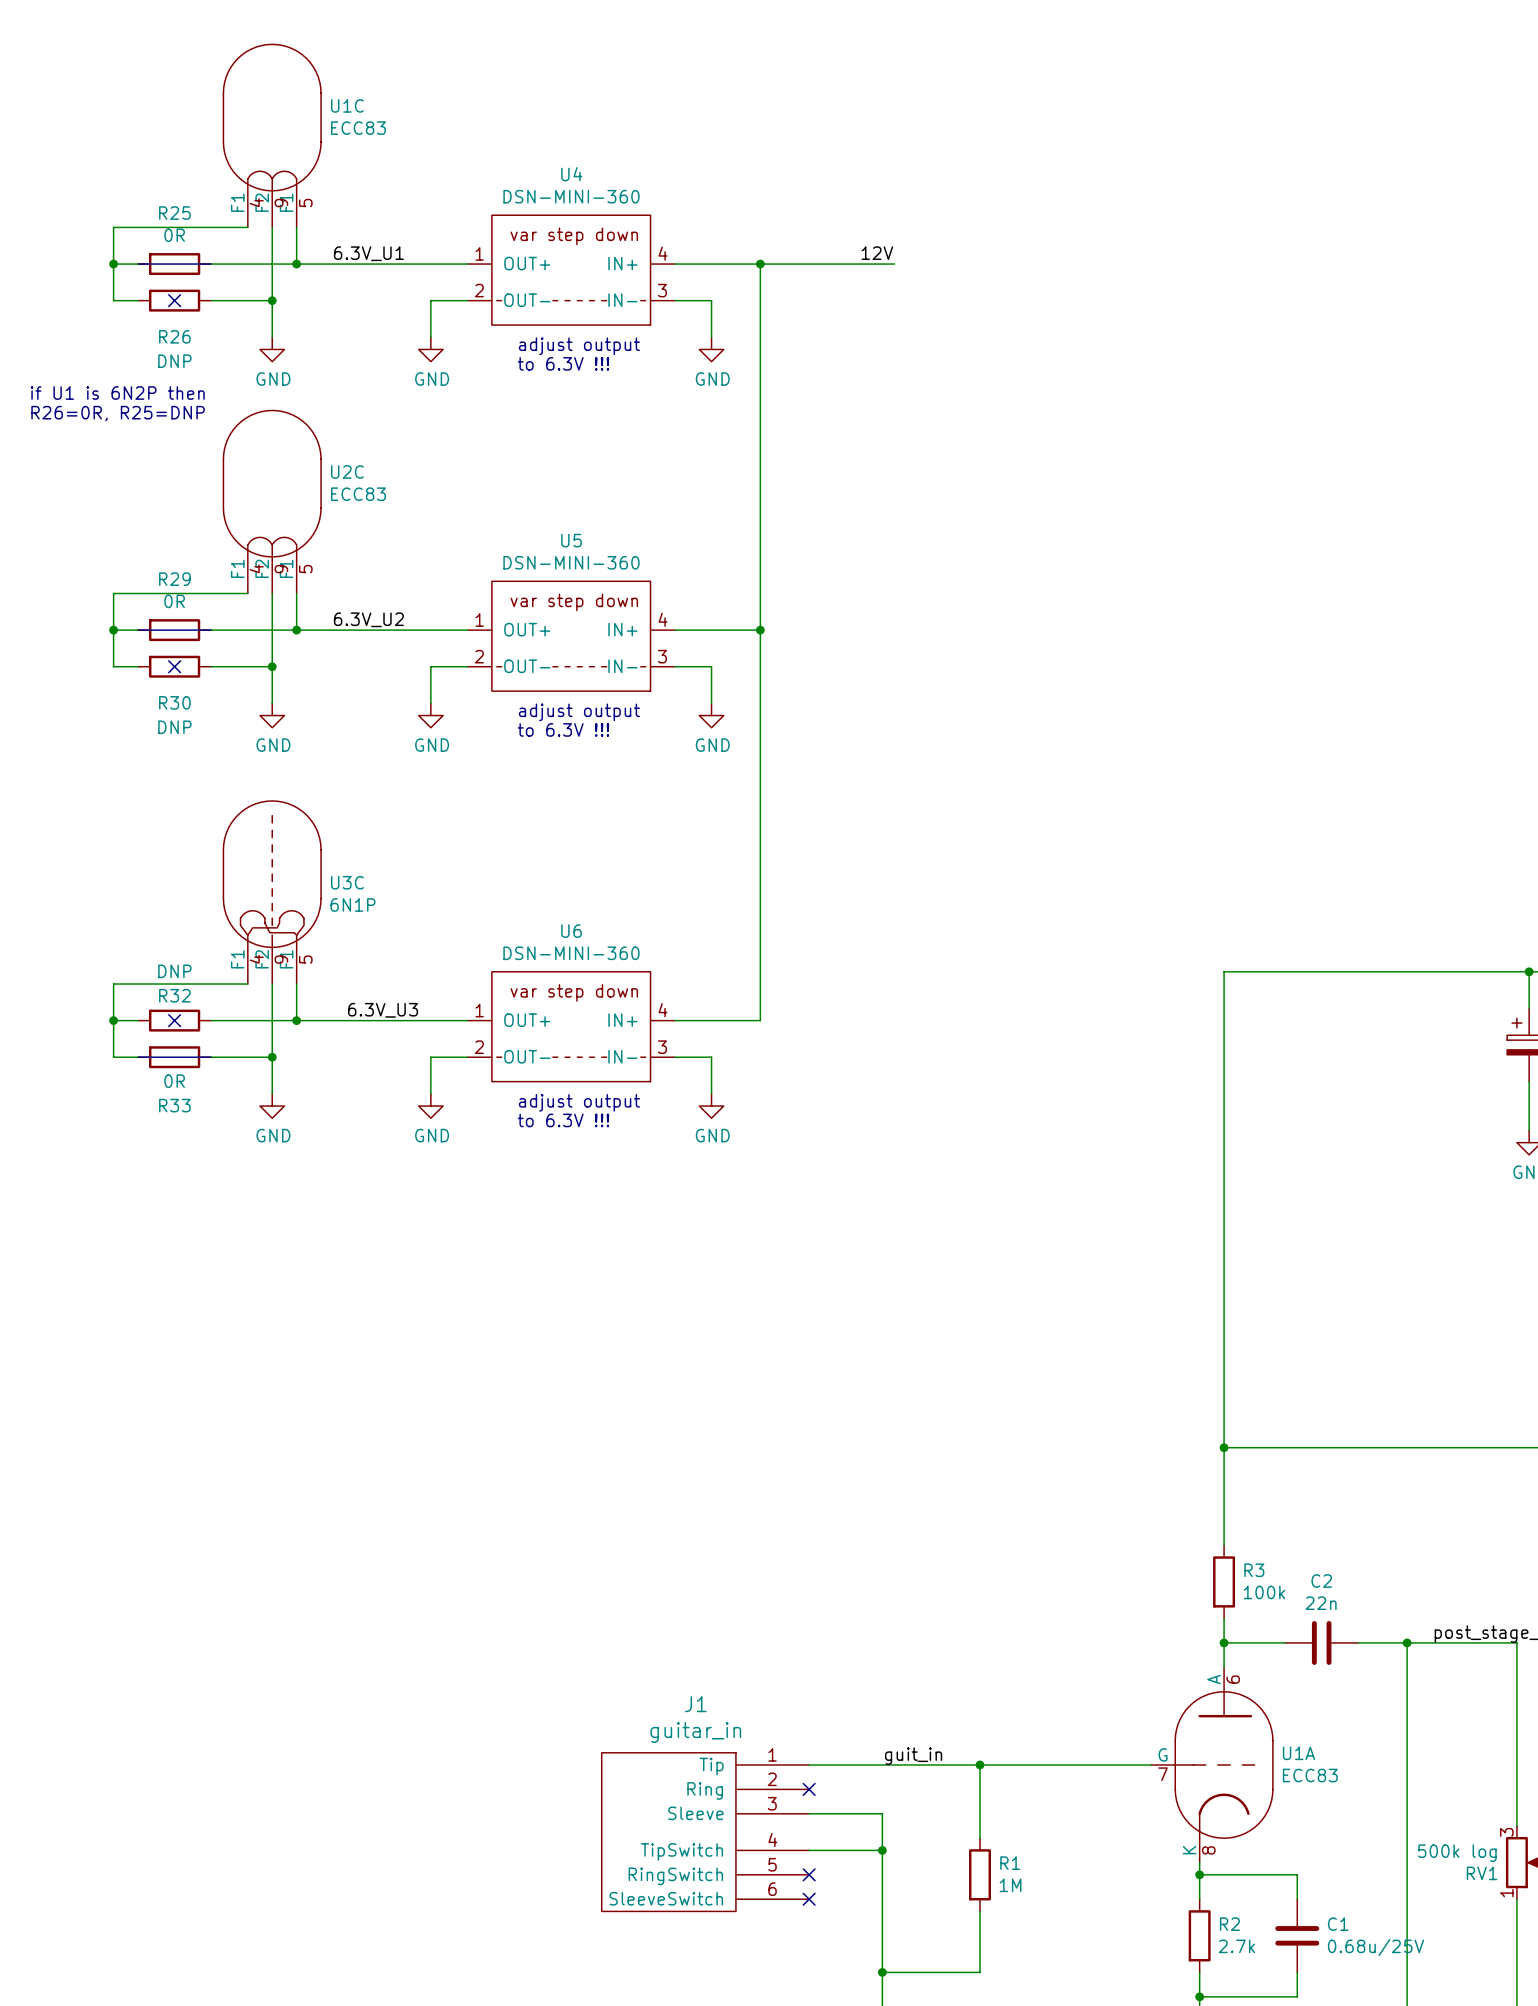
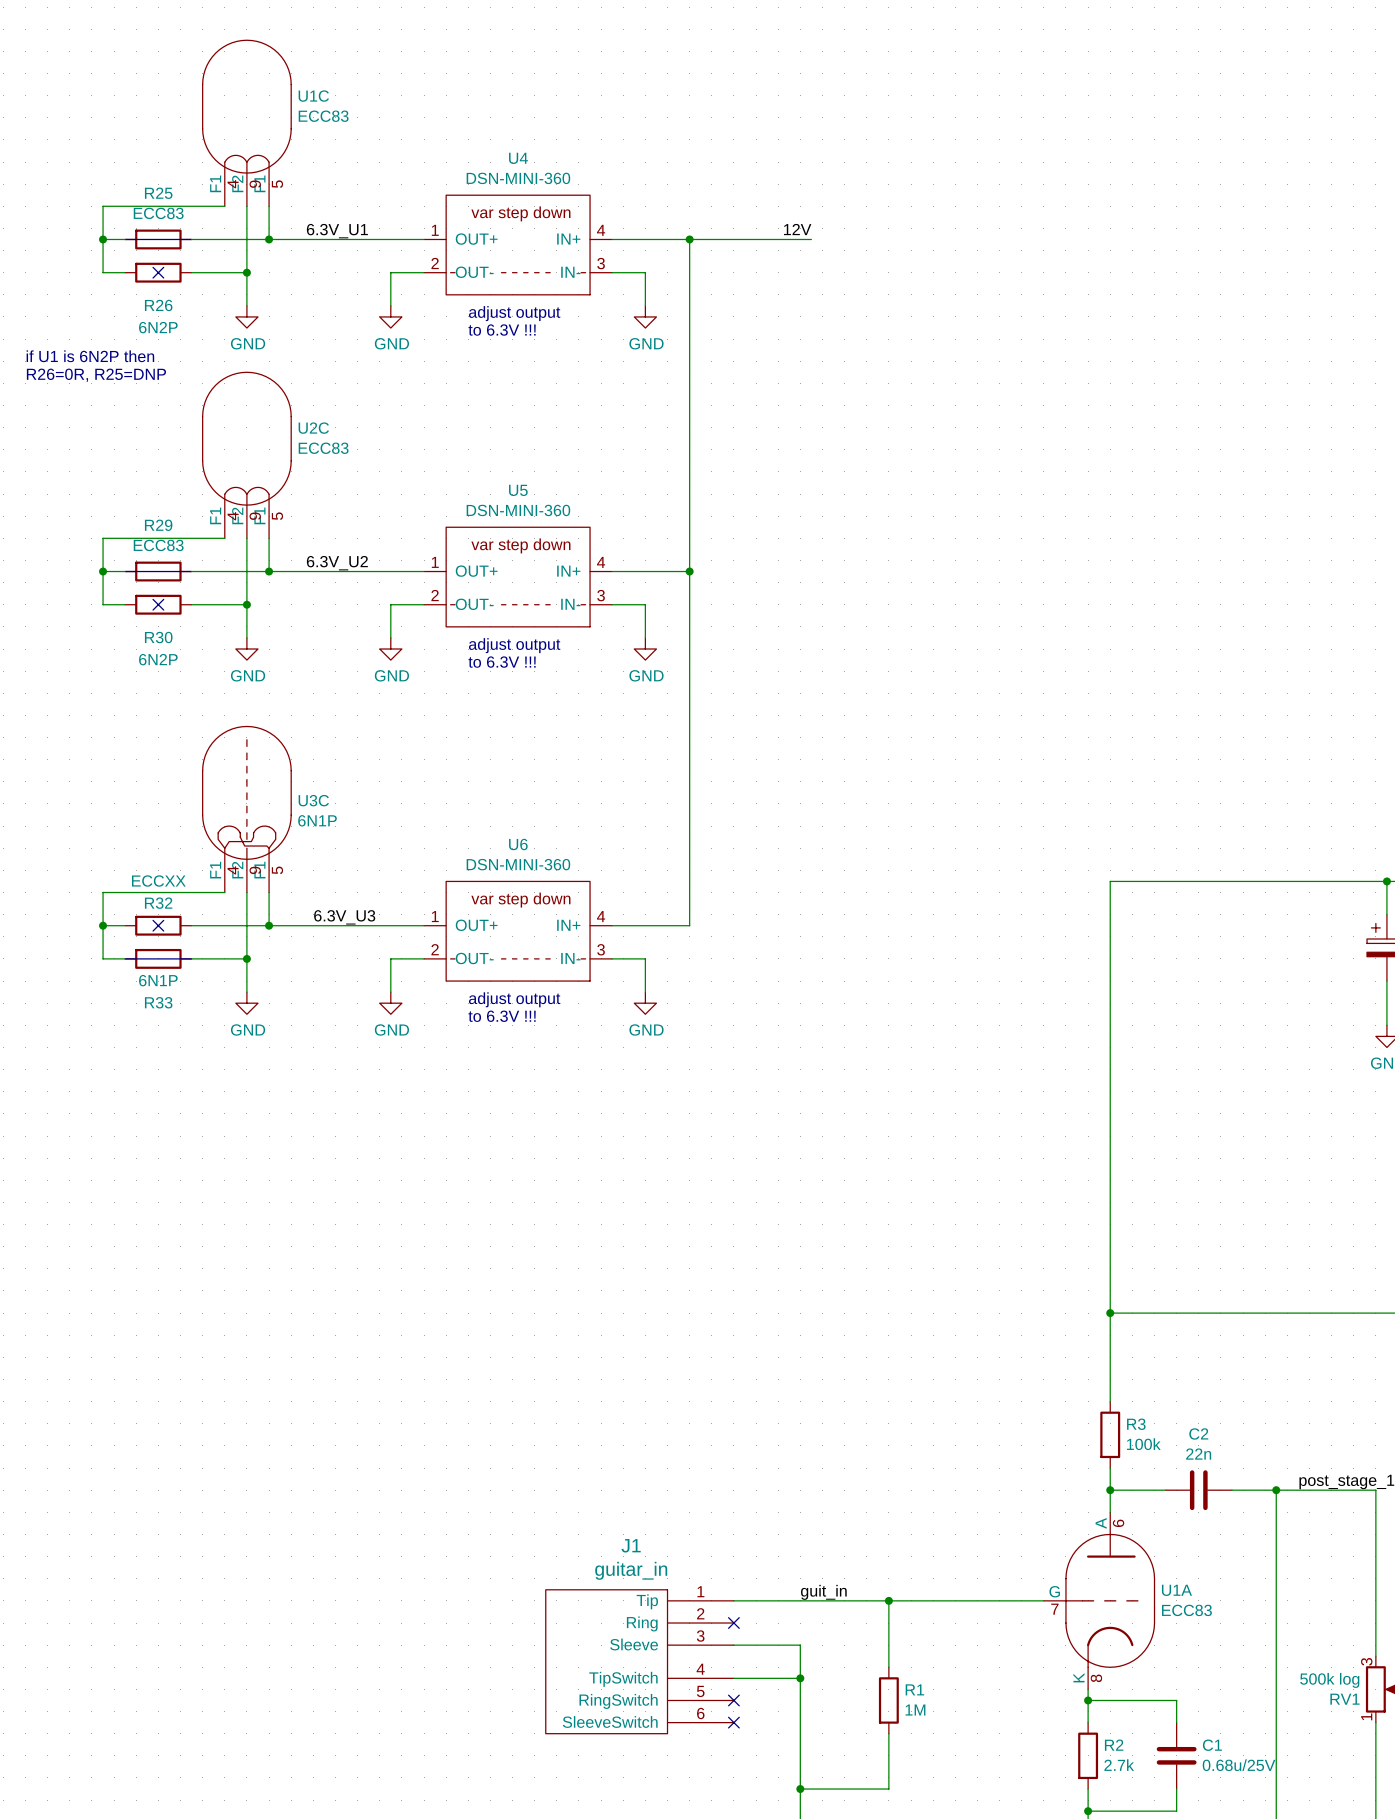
R25 value: 0R (174, 235) -> ECC83 (158, 213)
R26 value: DNP (174, 361) -> 6N2P (158, 327)
R29 value: 0R (174, 601) -> ECC83 (158, 545)
R30 value: DNP (174, 727) -> 6N2P (158, 659)
R32 value: DNP (174, 971) -> ECCXX (158, 881)
R33 value: 0R (174, 1081) -> 6N1P (158, 980)

